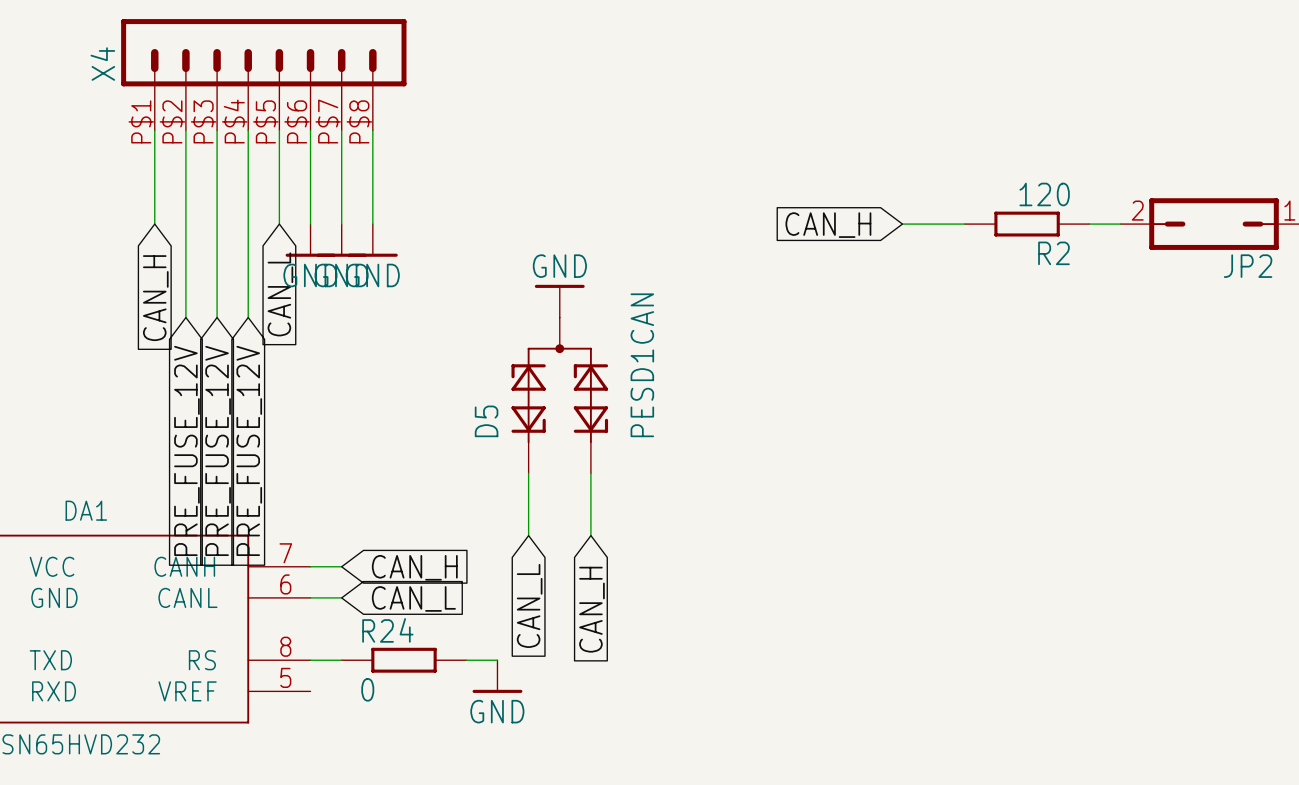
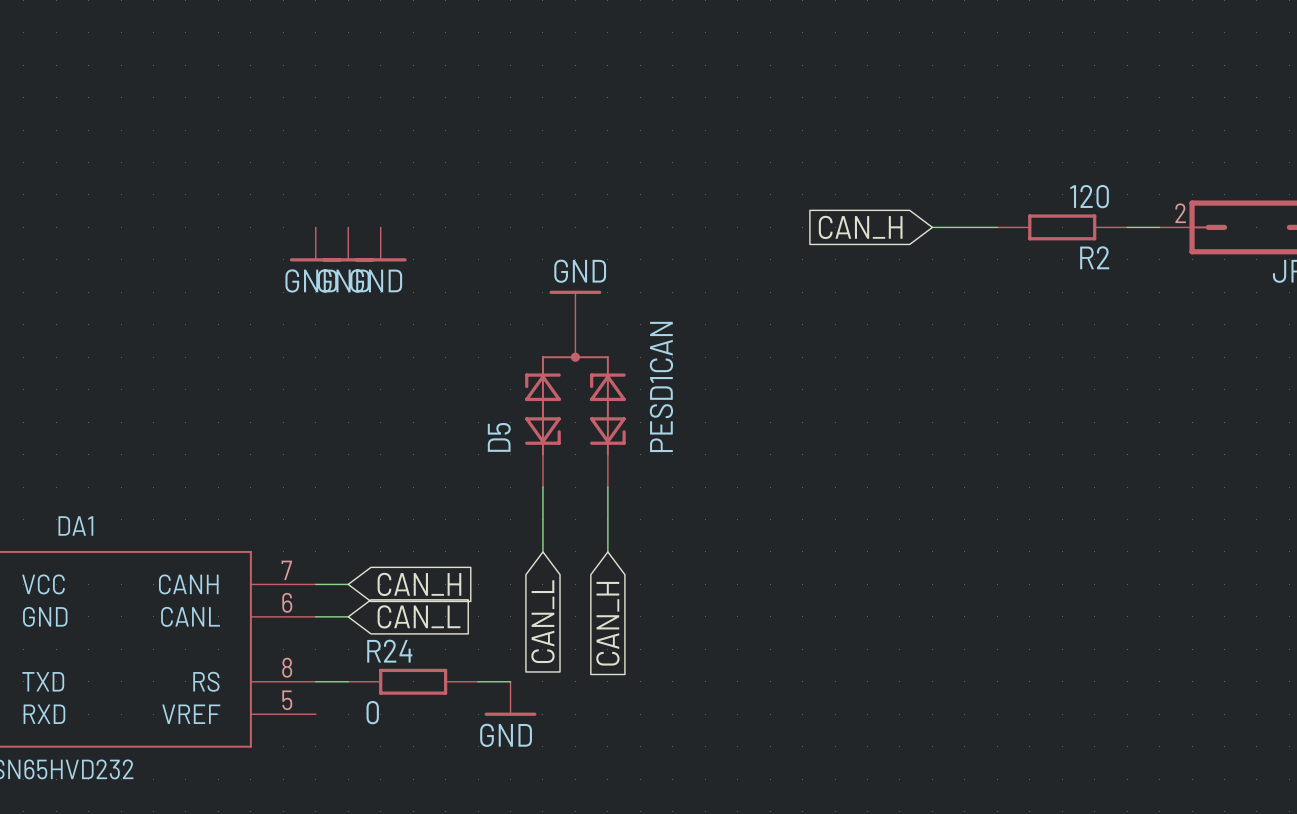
X4: (263, 74) -> none
wire: (154, 130) (154, 224) -> none
wire: (185, 130) (185, 317) -> none
wire: (217, 130) (217, 317) -> none
wire: (248, 130) (248, 317) -> none
wire: (279, 130) (279, 224) -> none
wire: (310, 130) (310, 224) -> none
wire: (341, 130) (341, 224) -> none
wire: (372, 130) (372, 224) -> none
global label: CAN_L (280, 294) -> none
global label: CAN_H (155, 298) -> none
global label: PRE_FUSE_12V (186, 450) -> none
global label: PRE_FUSE_12V (218, 450) -> none
global label: PRE_FUSE_12V (249, 450) -> none

